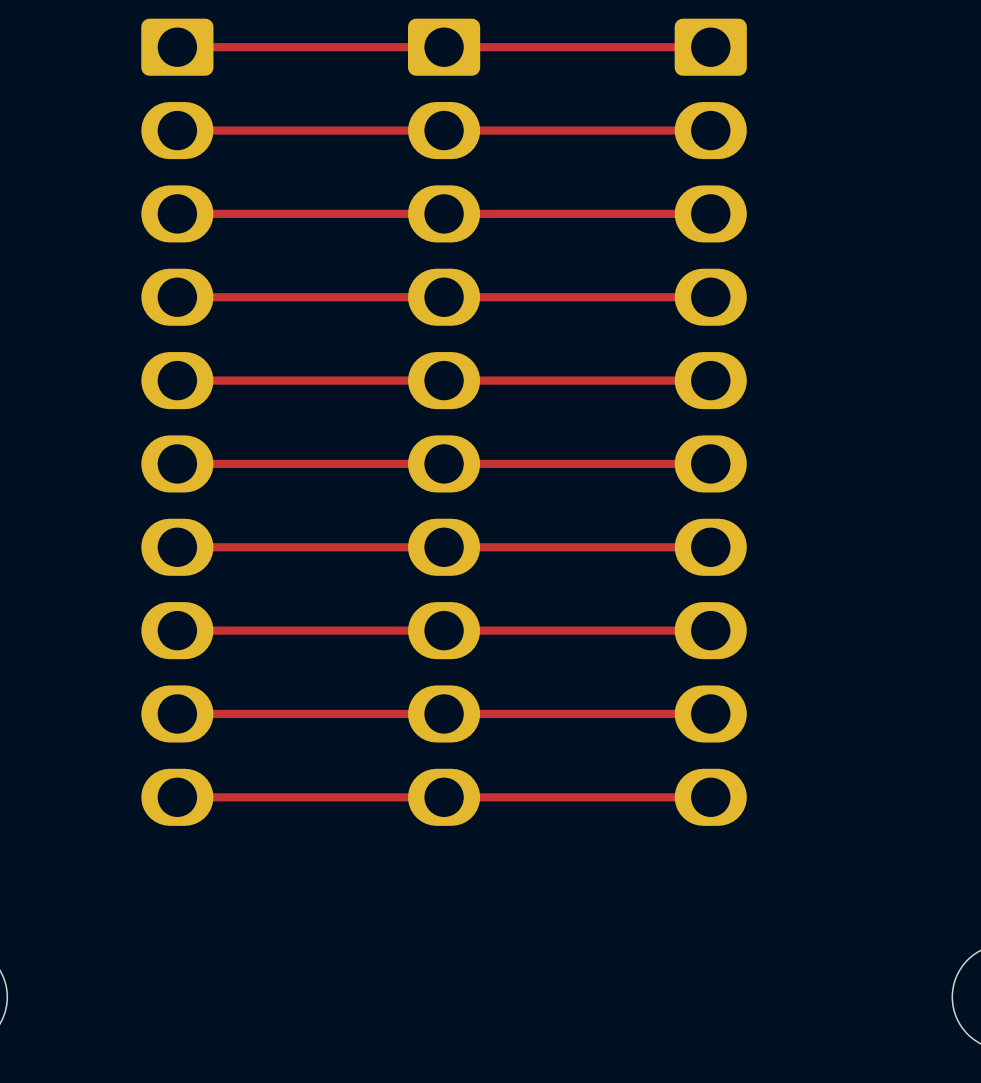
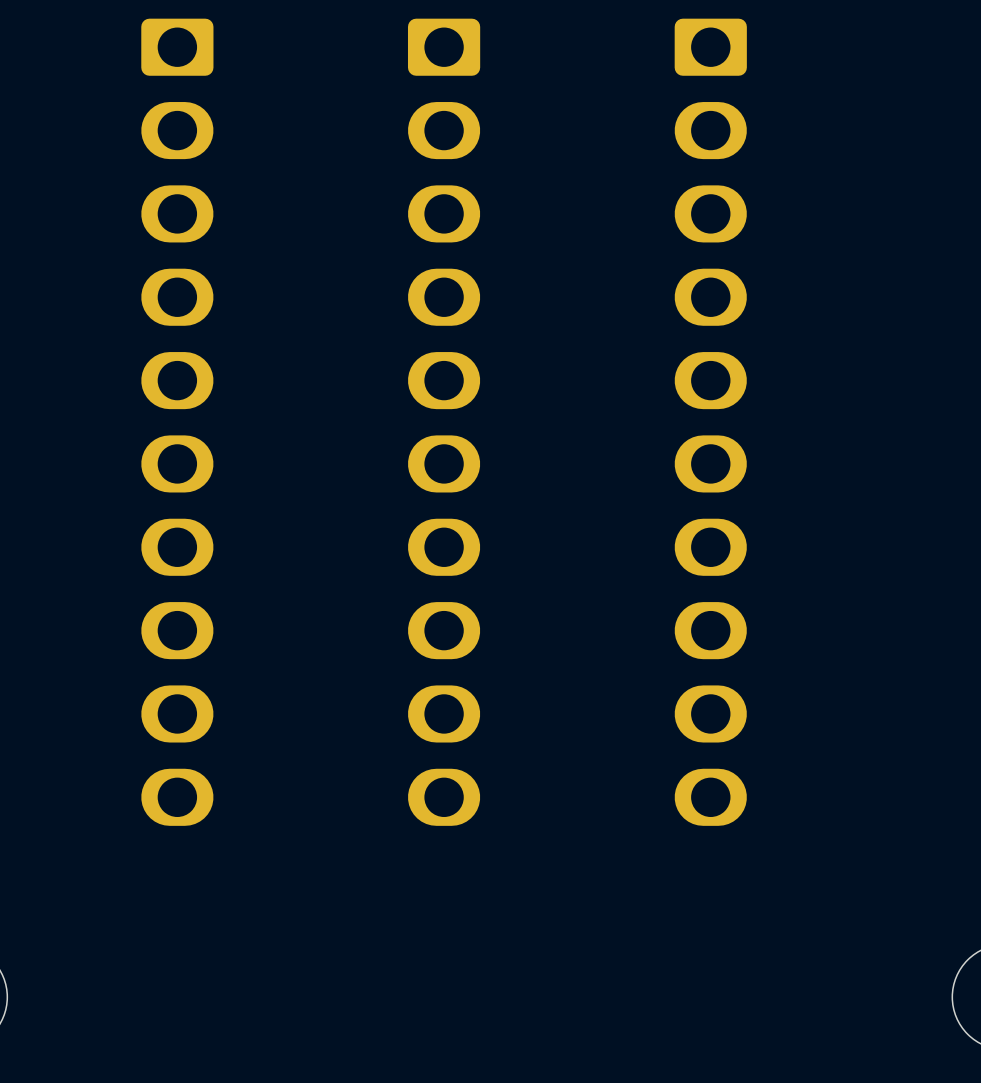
top track: (710, 47) (177, 47) -> none
top track: (710, 130) (177, 130) -> none
top track: (710, 213) (177, 213) -> none
top track: (710, 297) (177, 297) -> none
top track: (710, 380) (177, 380) -> none
top track: (710, 463) (177, 463) -> none
top track: (710, 547) (177, 547) -> none
top track: (710, 630) (177, 630) -> none
top track: (710, 713) (177, 713) -> none
top track: (710, 797) (177, 797) -> none

